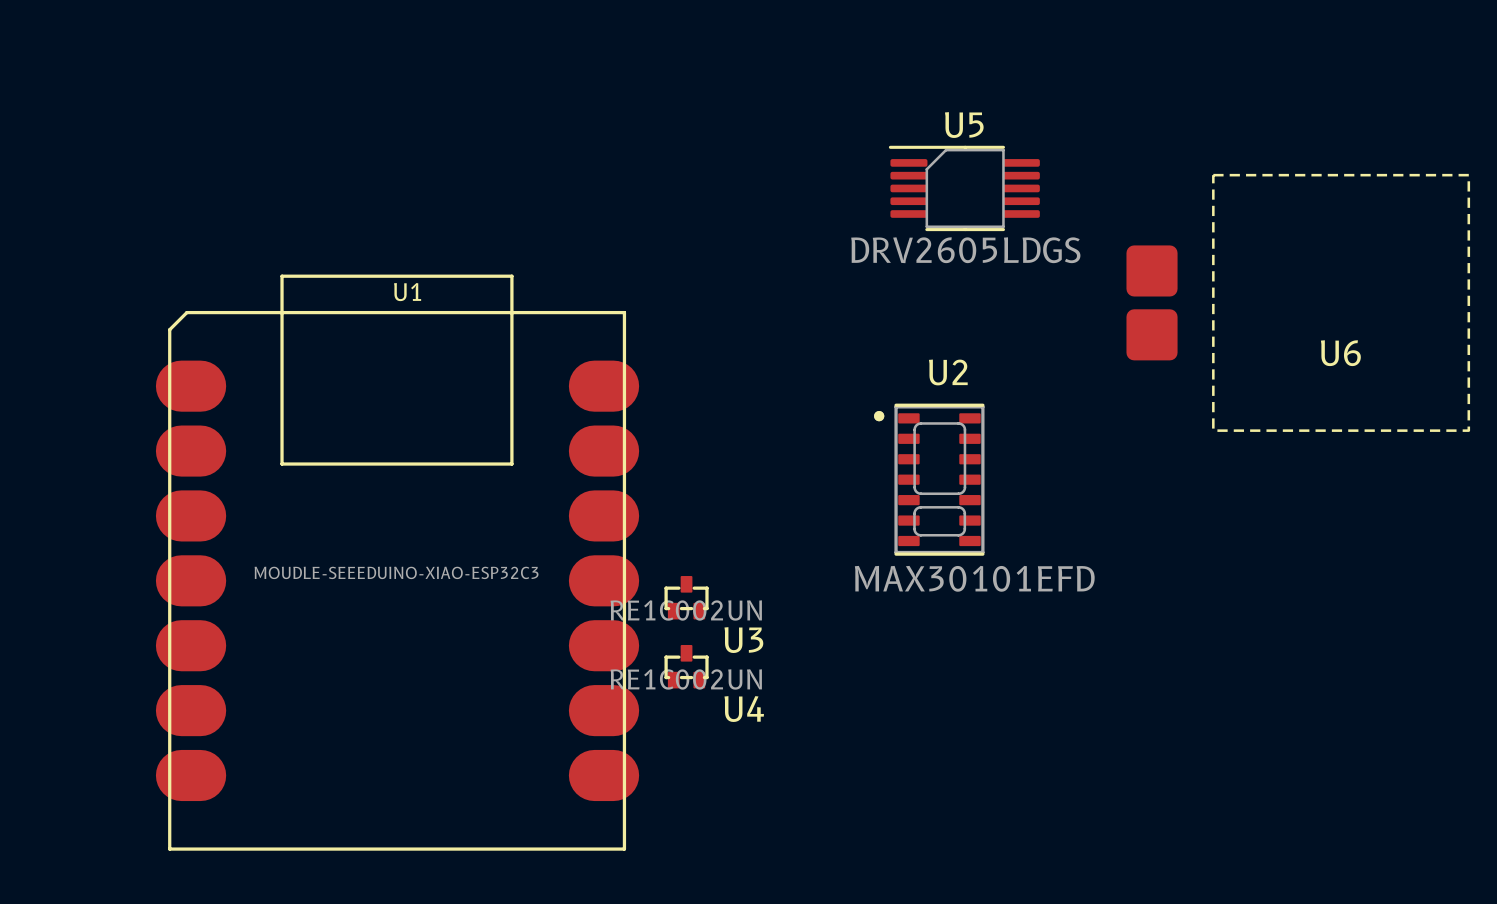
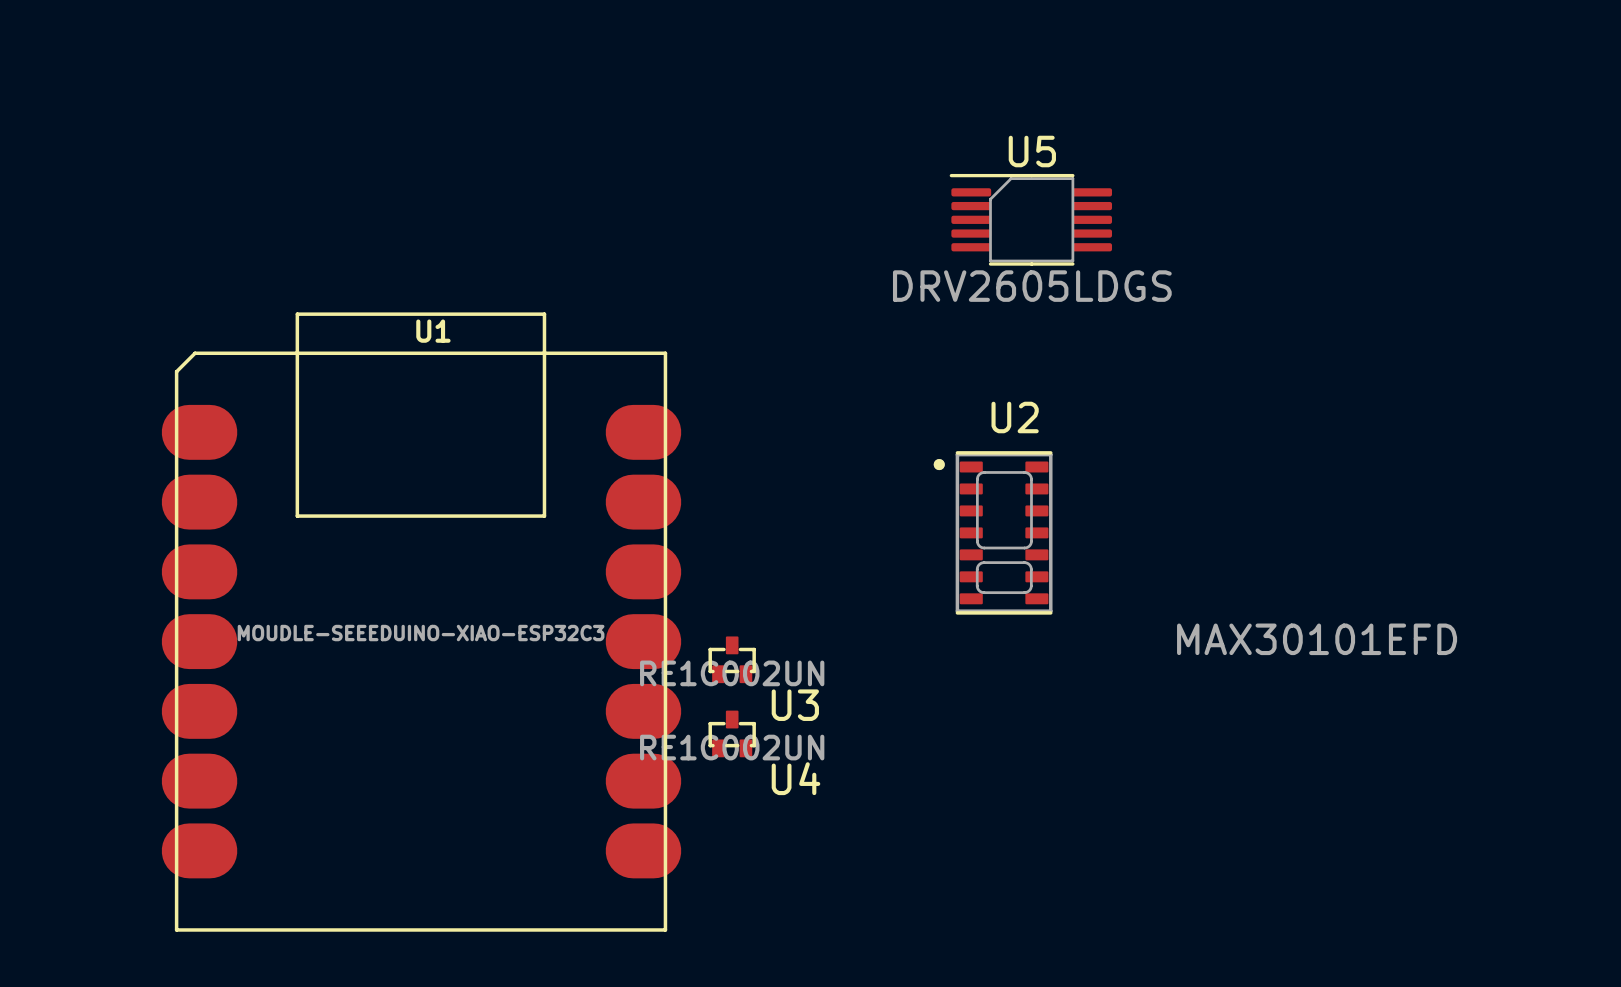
U6: (1298, 302) -> none
U2 value position: MAX30101EFD (974, 578) -> MAX30101EFD (1317, 639)

